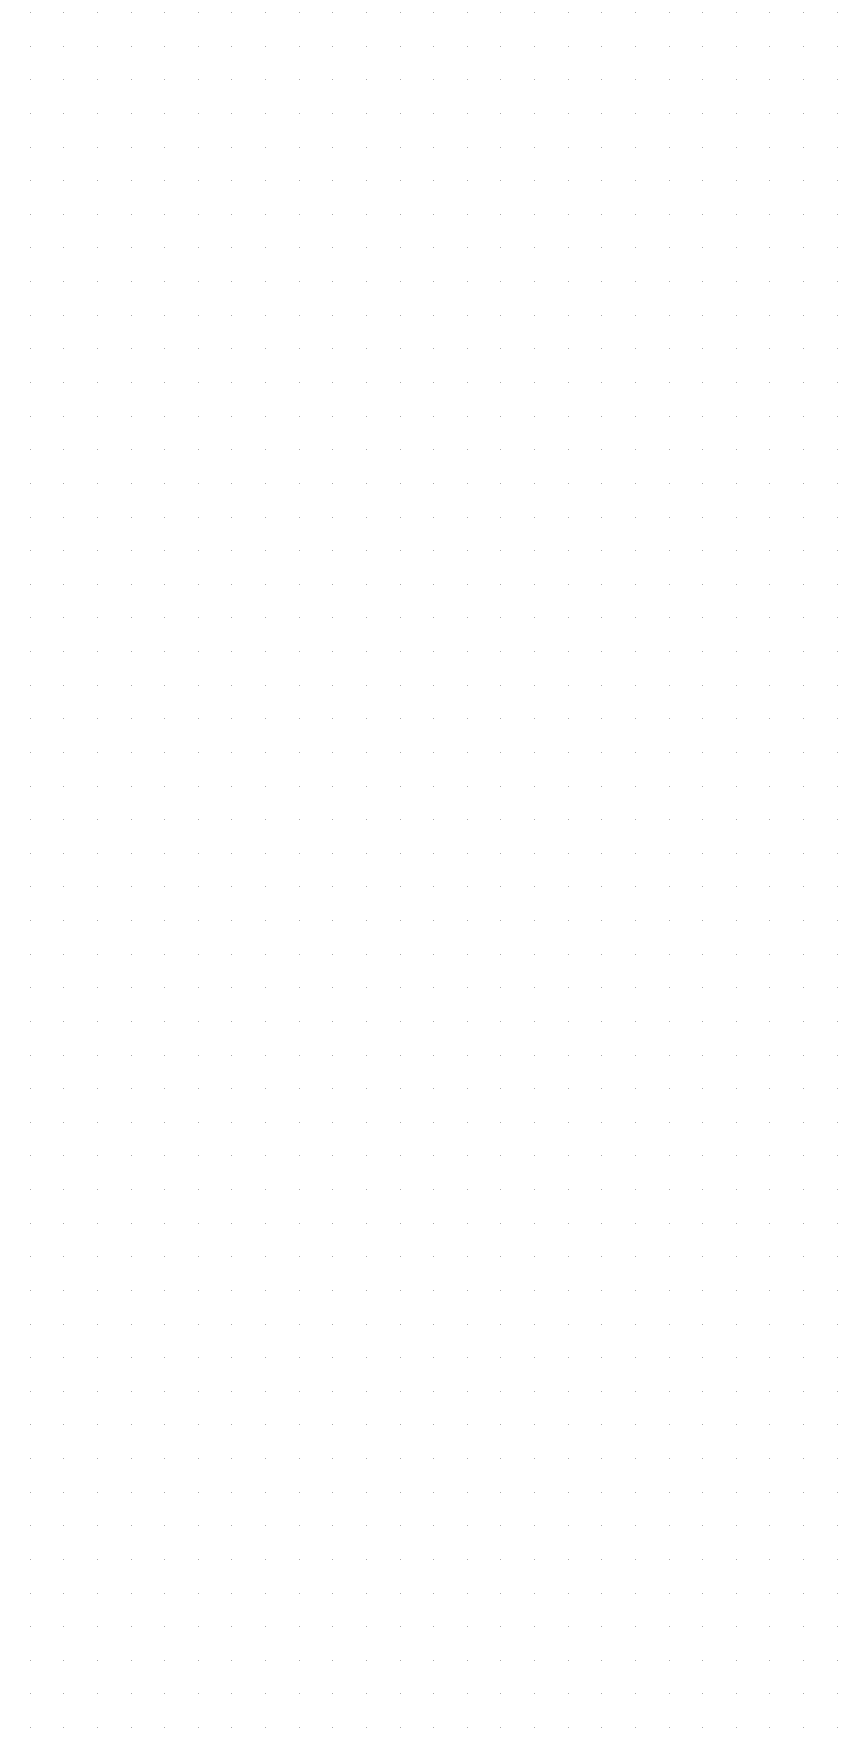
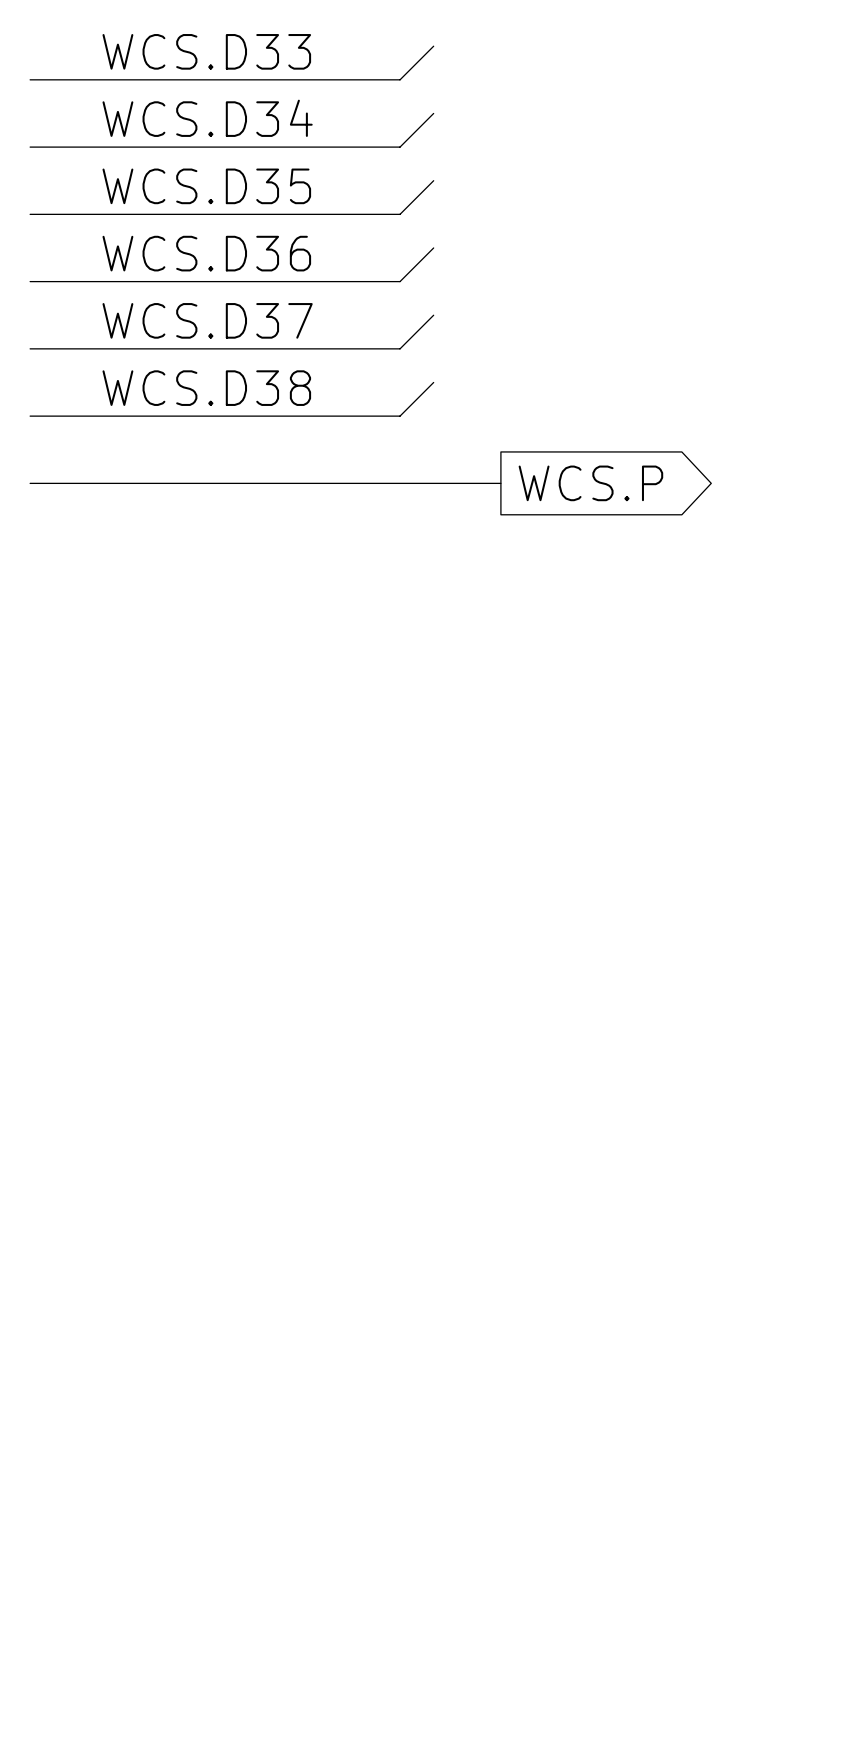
wire: none -> (433, 46) (400, 79) (30, 79)
label: none -> WCS.D33 (206, 51)
wire: none -> (433, 113) (400, 147) (30, 147)
label: none -> WCS.D34 (207, 118)
wire: none -> (433, 180) (400, 214) (30, 214)
label: none -> WCS.D35 (206, 186)
wire: none -> (433, 247) (400, 281) (30, 281)
label: none -> WCS.D36 (206, 253)
wire: none -> (433, 315) (400, 348) (30, 348)
label: none -> WCS.D37 (207, 320)
wire: none -> (433, 382) (400, 416) (30, 416)
label: none -> WCS.D38 (206, 388)
wire: none -> (30, 483) (500, 483)
global label: none -> WCS.P (590, 483)

